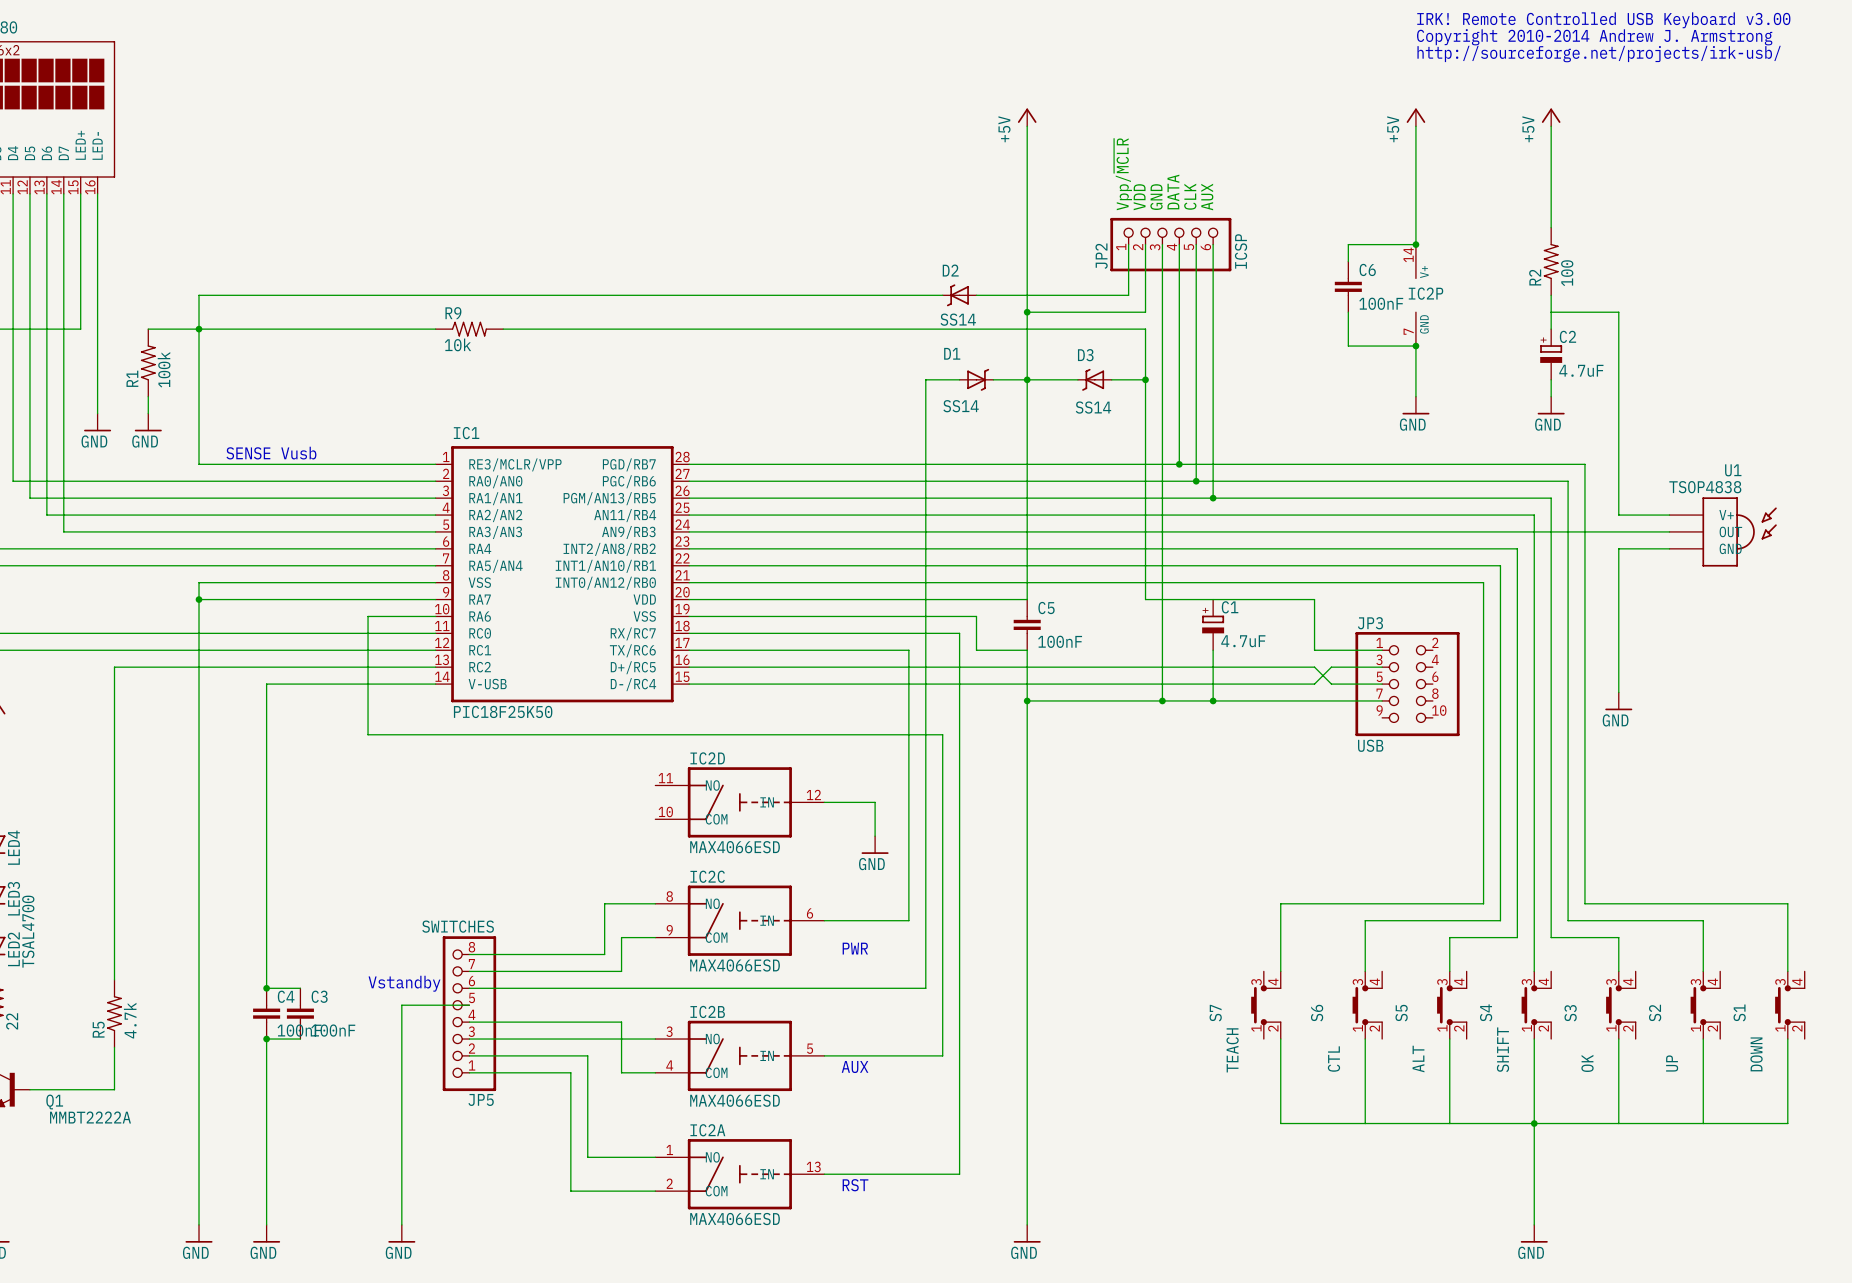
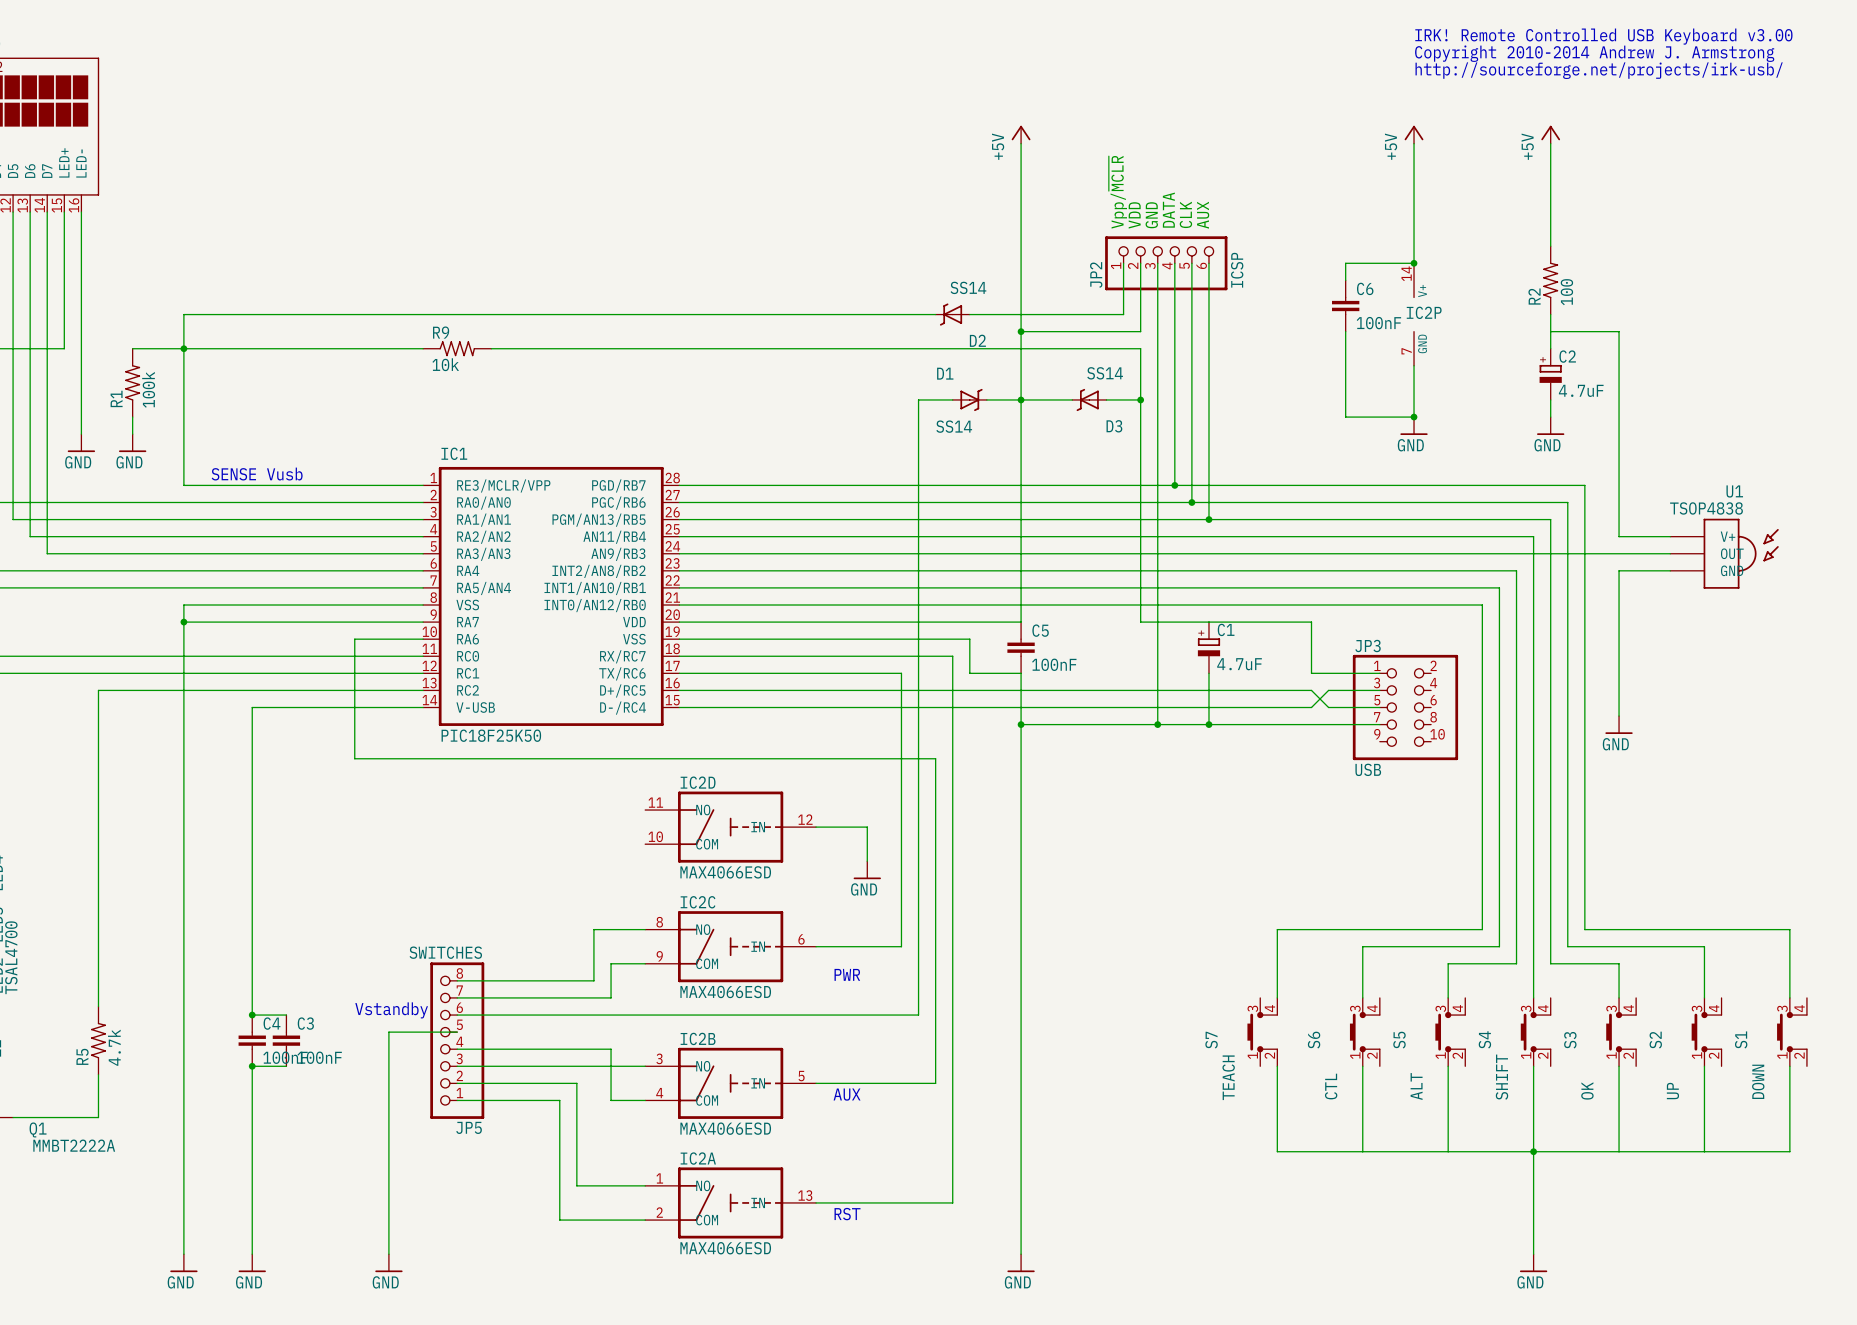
D2 name position: D2 (950, 270) -> D2 (977, 340)
D2 value position: SS14 (958, 319) -> SS14 (968, 287)
wire: (1348, 346) (1415, 346) -> (1345, 365) (1345, 417) (1414, 417)
junction: (1415, 346) -> none
D3 name position: D3 (1085, 355) -> D3 (1114, 426)
junction: none -> (1414, 417)
D3 value position: SS14 (1093, 407) -> SS14 (1105, 373)

